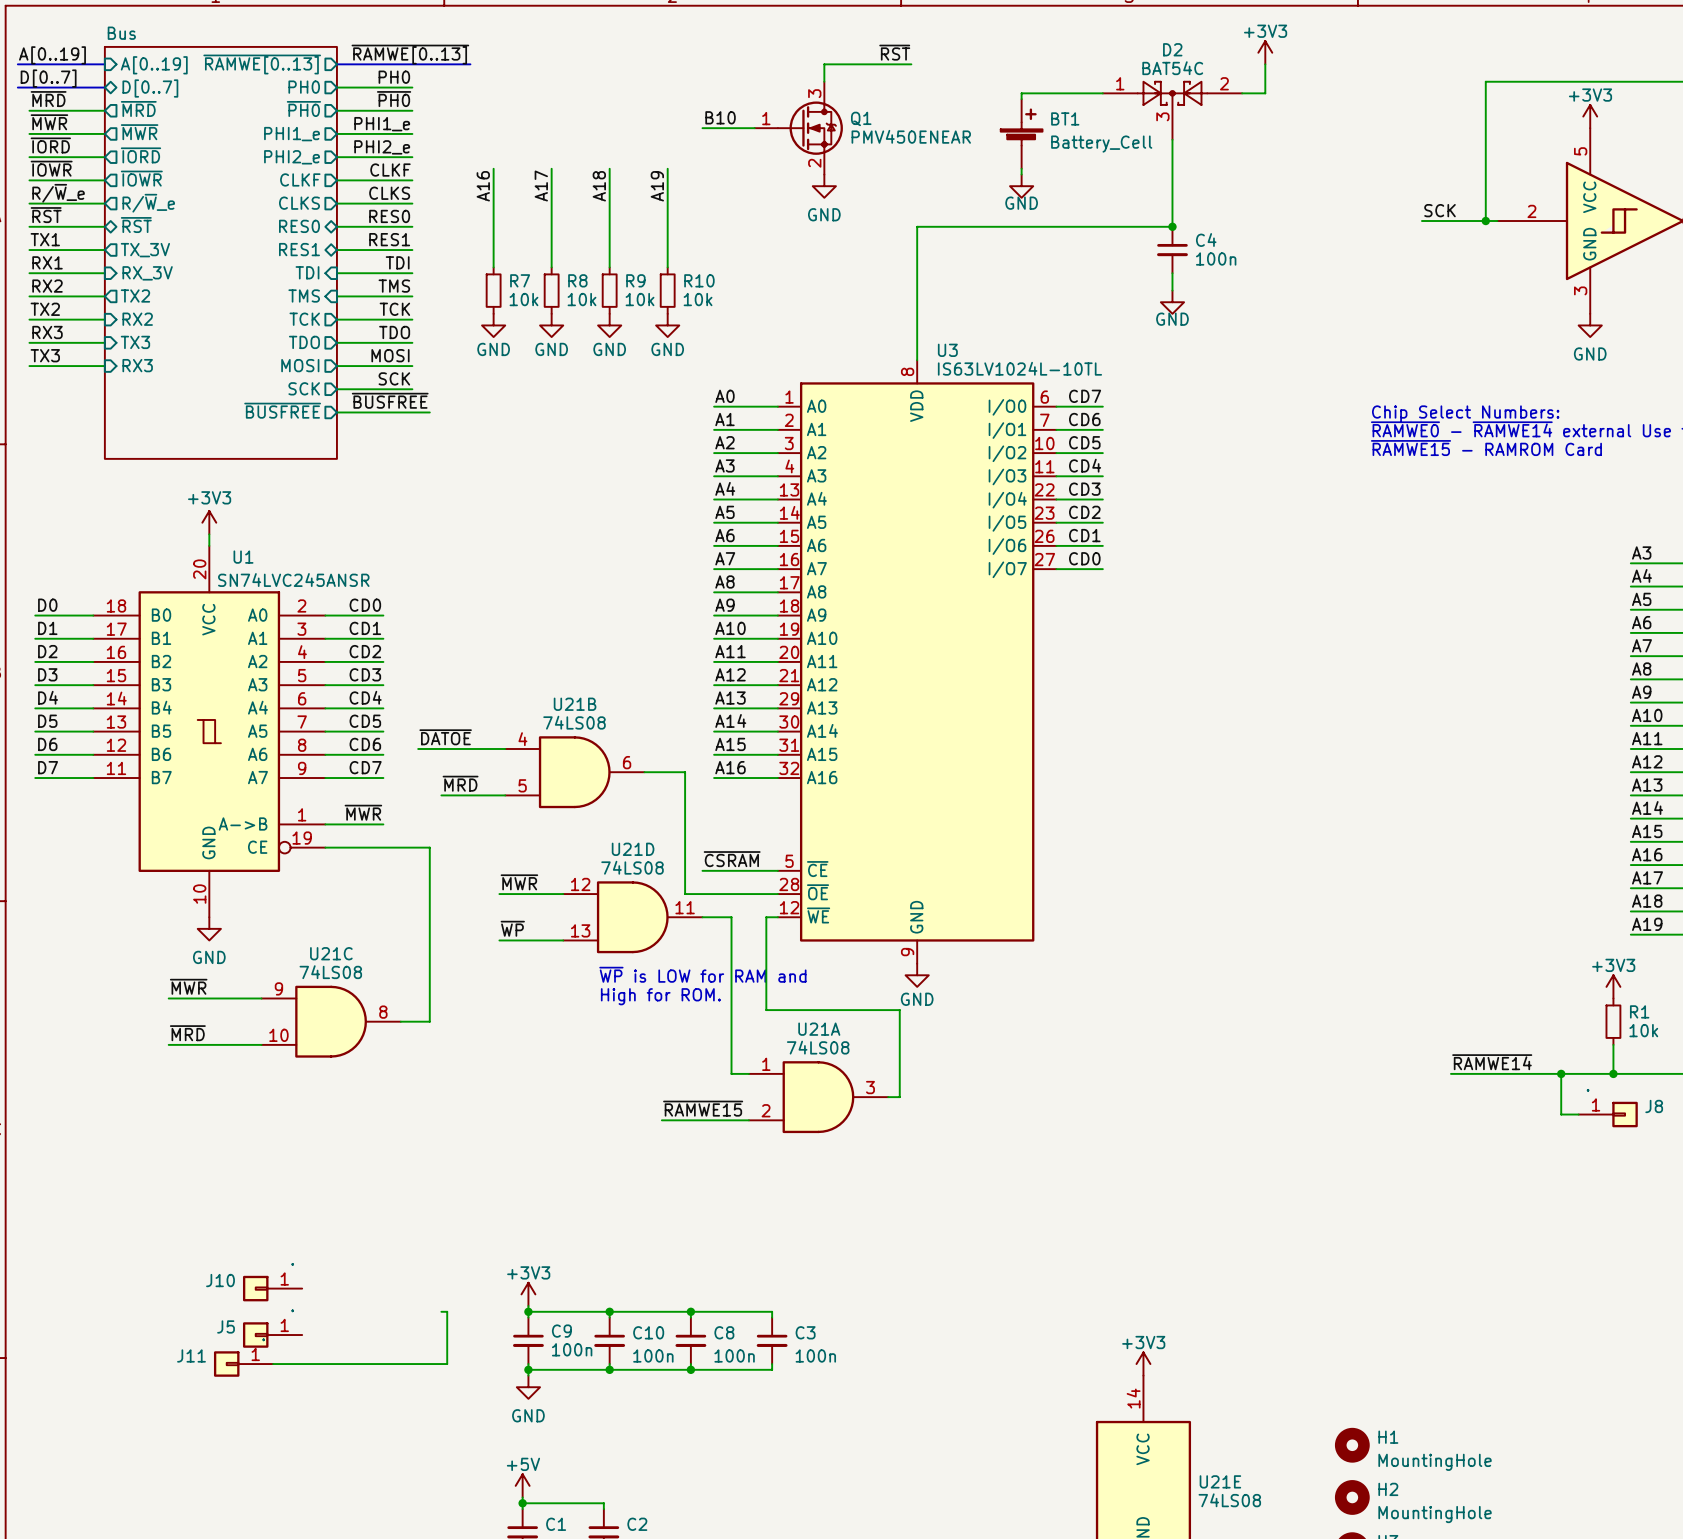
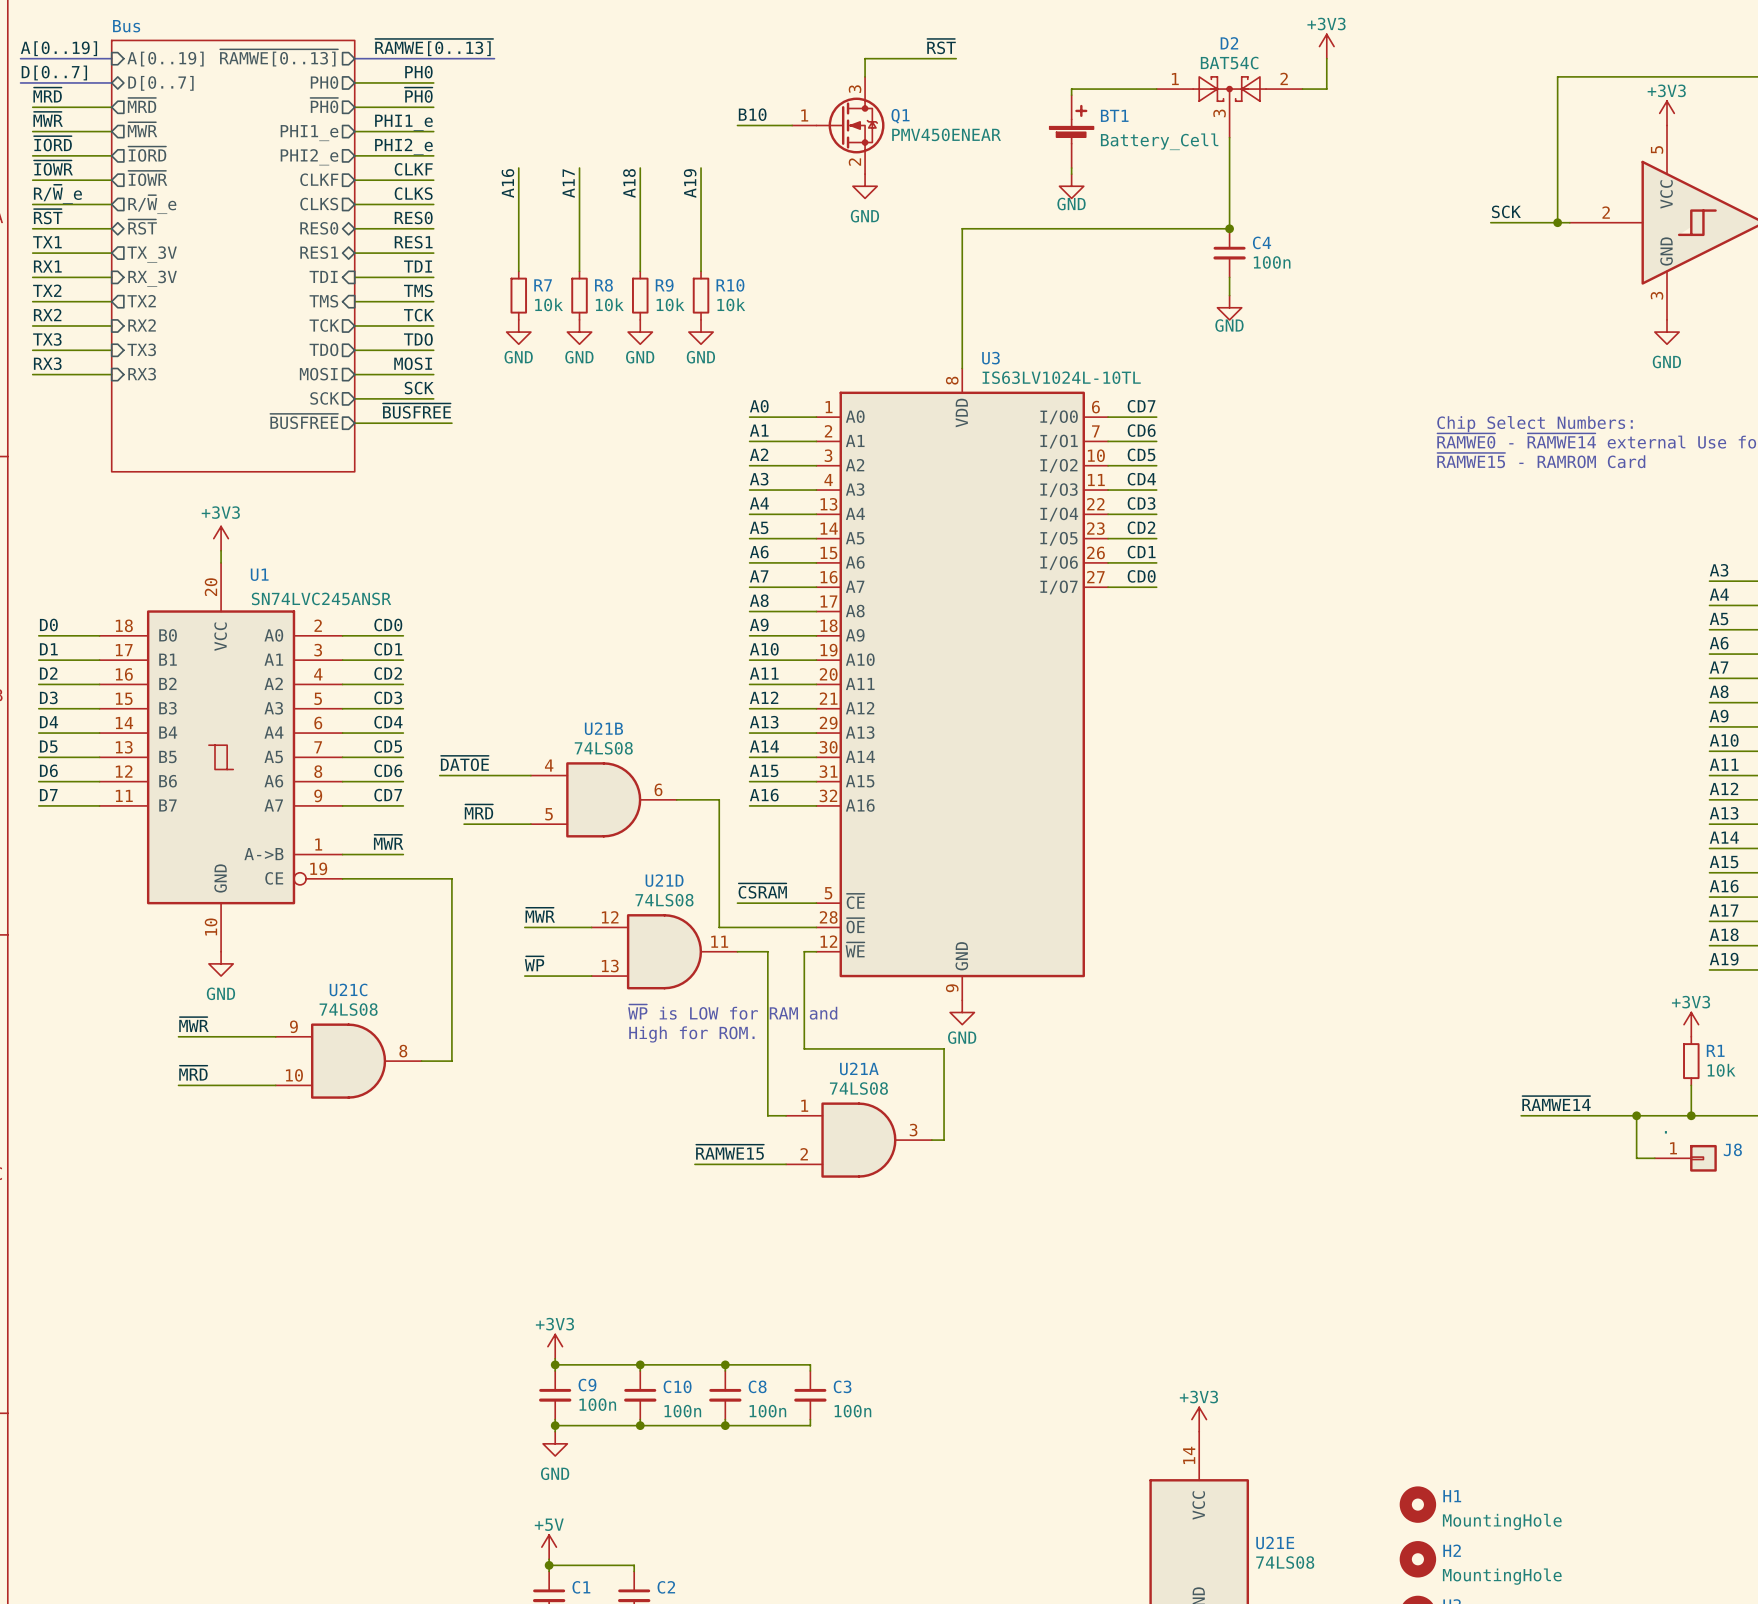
label: RX2 (47, 286) -> TX2 (47, 290)
label: TX2 (45, 309) -> RX2 (47, 315)
label: RX3 (47, 332) -> TX3 (47, 339)
label: TX3 (45, 355) -> RX3 (47, 363)
J10: . (272, 1288) -> none
wire: (441, 1311) (447, 1311) (447, 1364) (273, 1364) -> none
J5: . (272, 1335) -> none
J11: . (243, 1364) -> none

